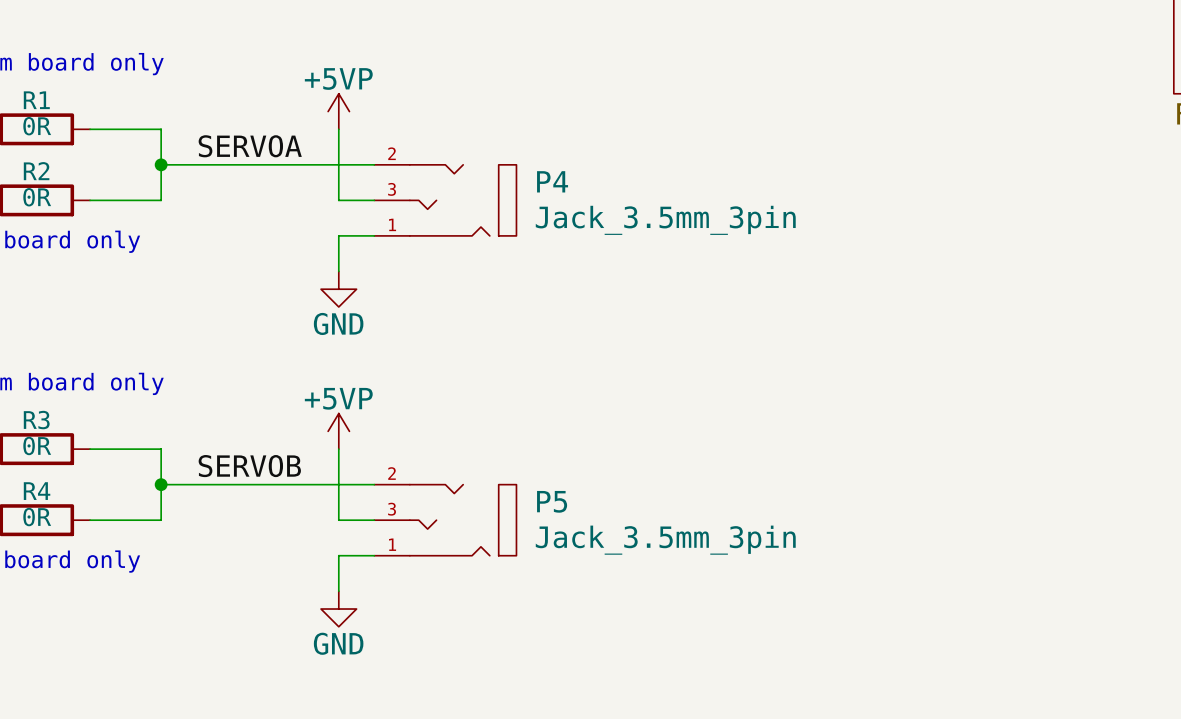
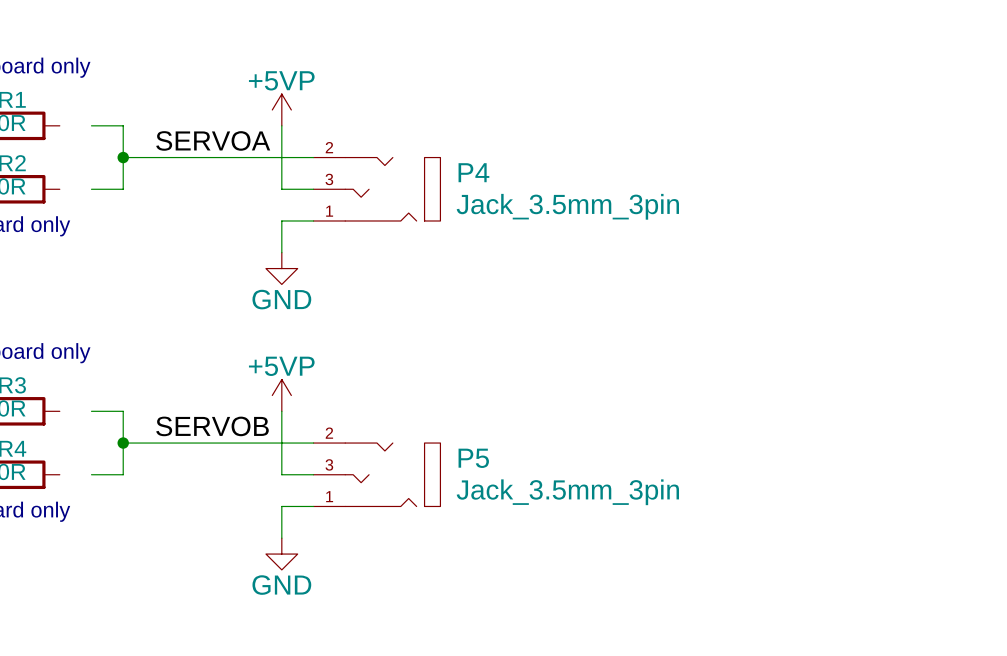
wire: (90, 129) (125, 129) -> none
wire: (90, 200) (125, 200) -> none
wire: (90, 449) (125, 449) -> none
wire: (90, 520) (125, 520) -> none

